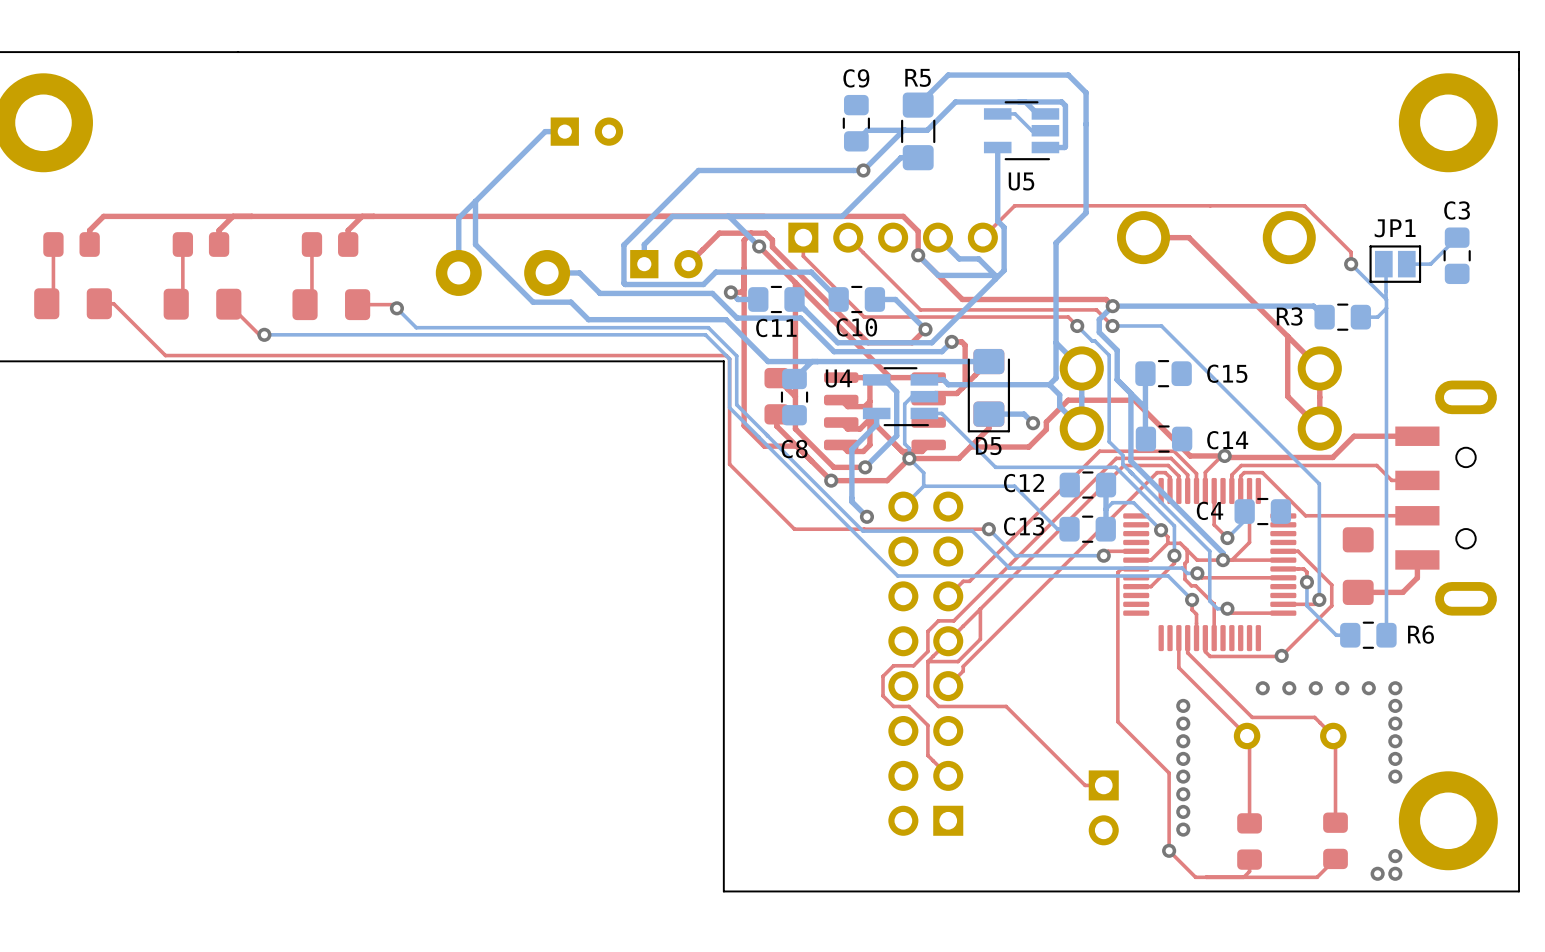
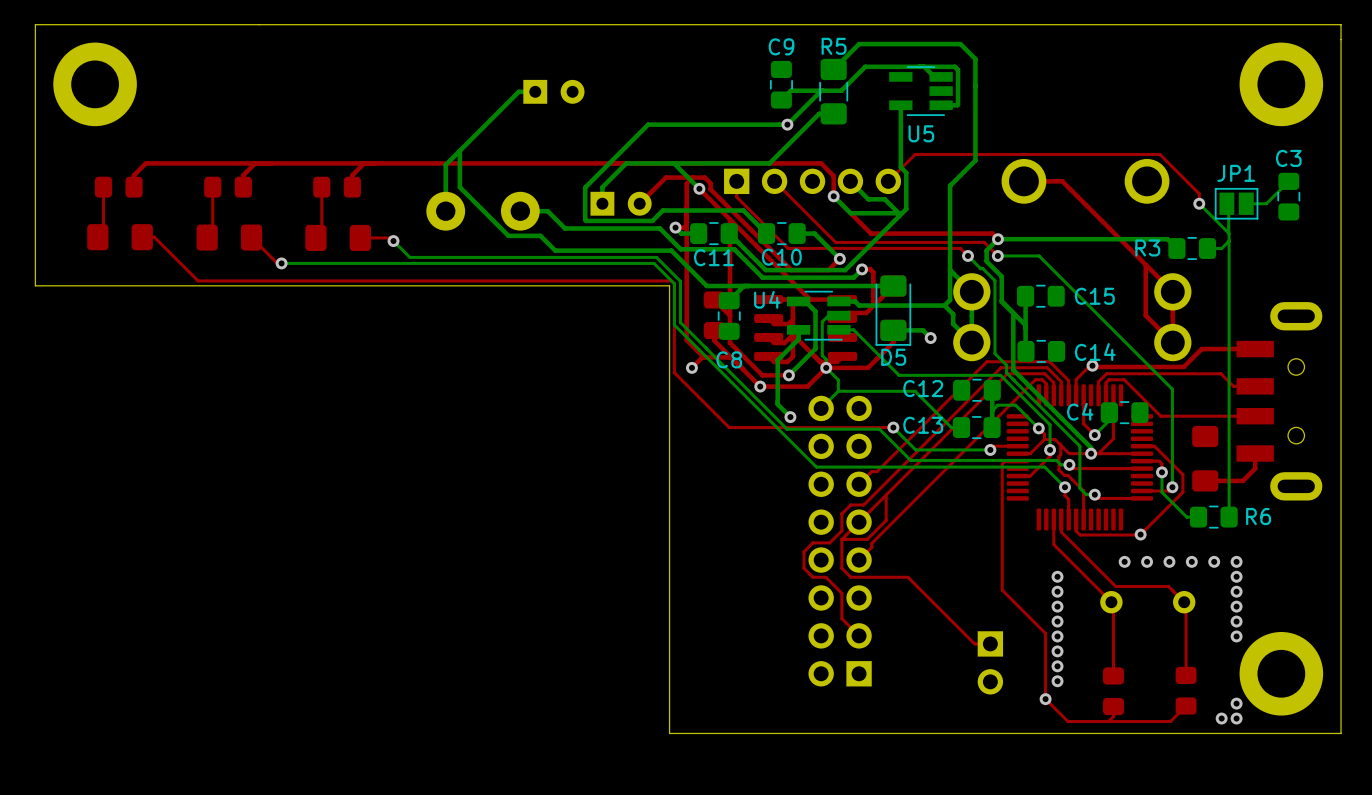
bottom track: (997, 113) (1015, 113) (1031, 130) (1045, 130) -> none
top track: none -> (703, 357) (691, 367)
top track: (970, 447) (1028, 447) (1046, 429) (1046, 422) (1068, 400) (1134, 400) (1190, 455) (1224, 455) -> none
via: none -> (691, 367)

